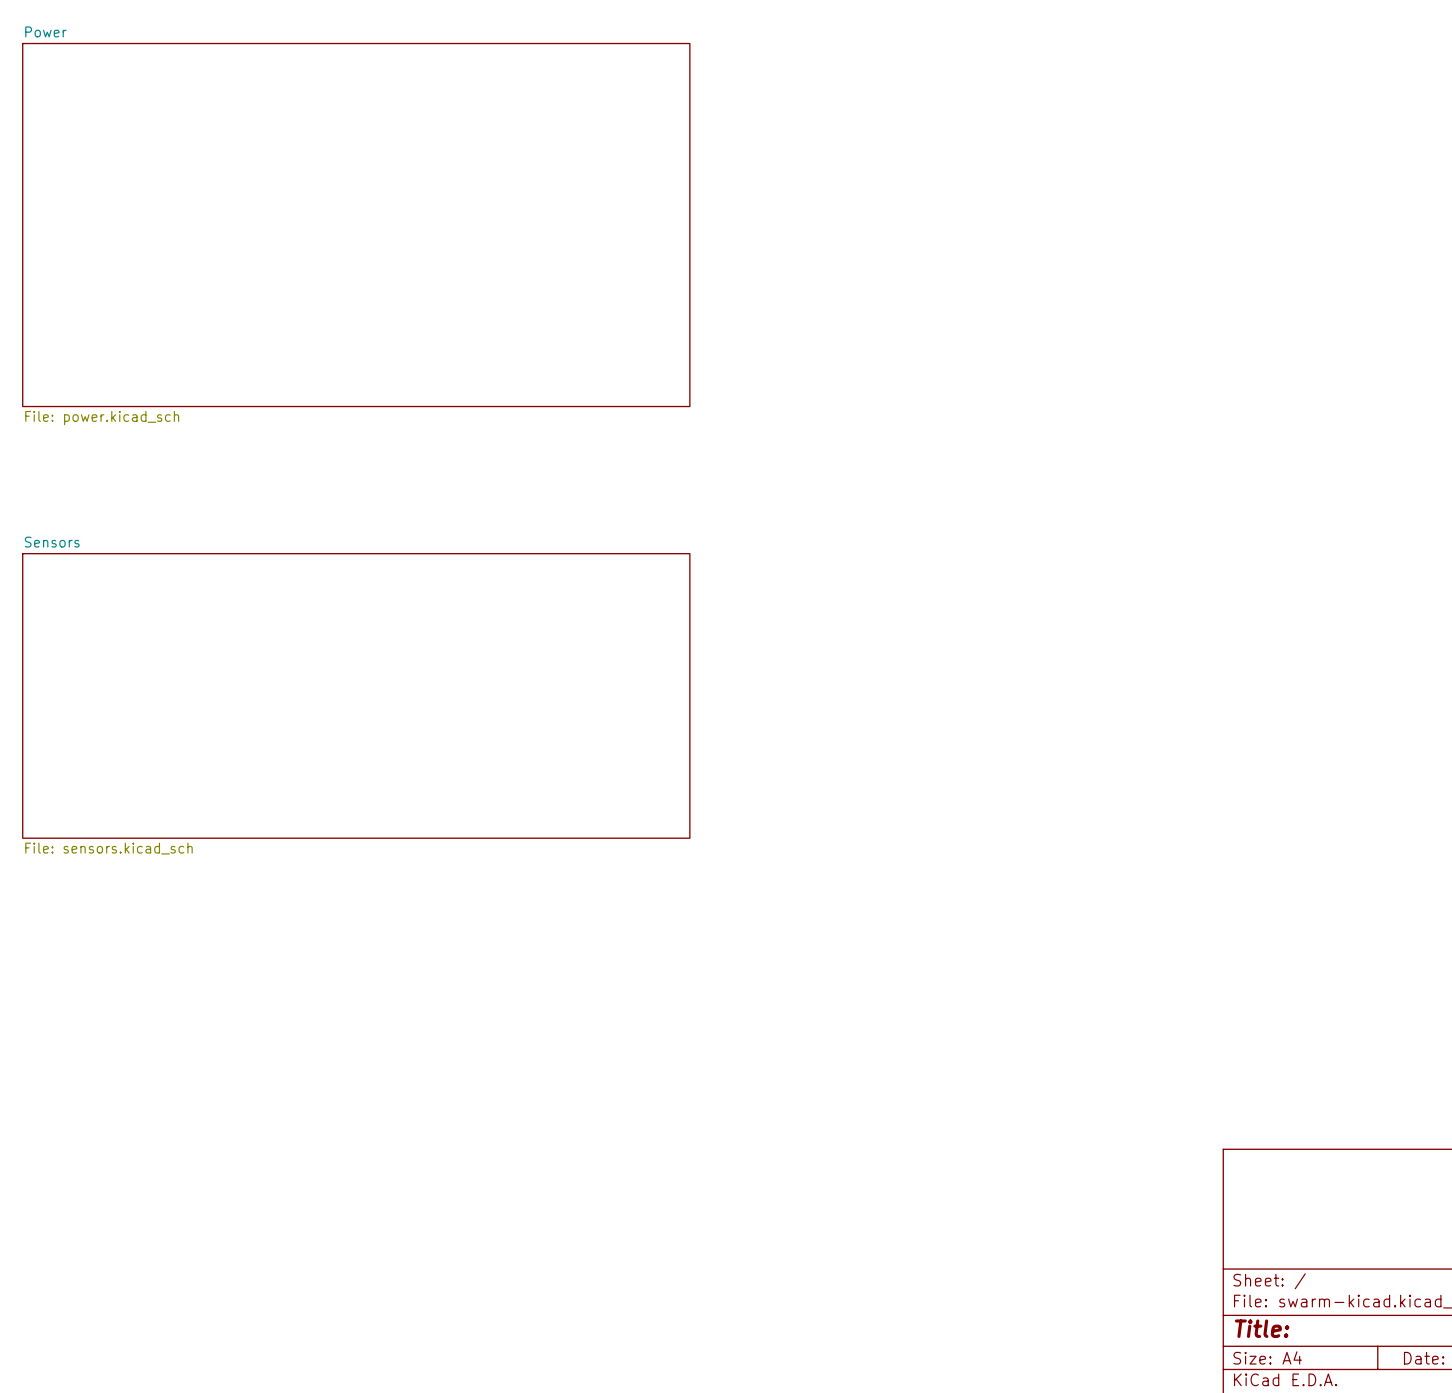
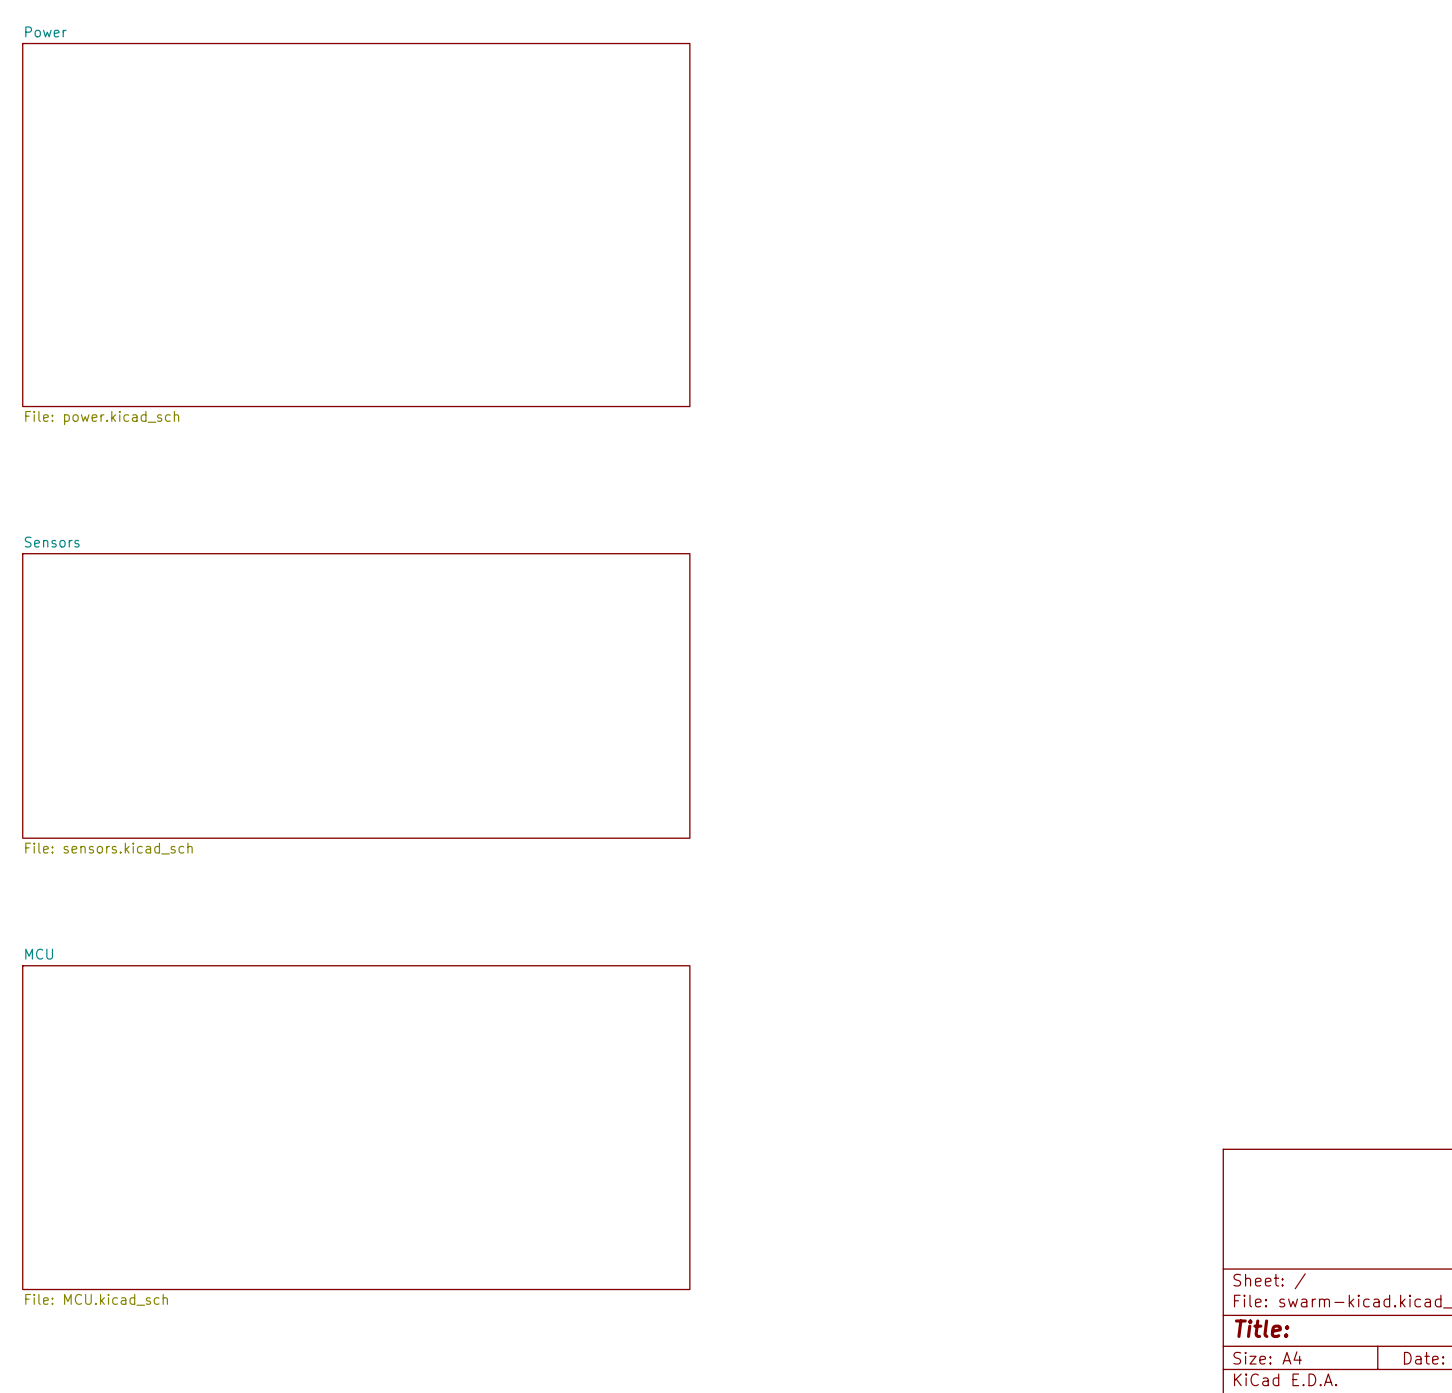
sheet MCU: none -> File: MCU.kicad_sch (356, 1127)

